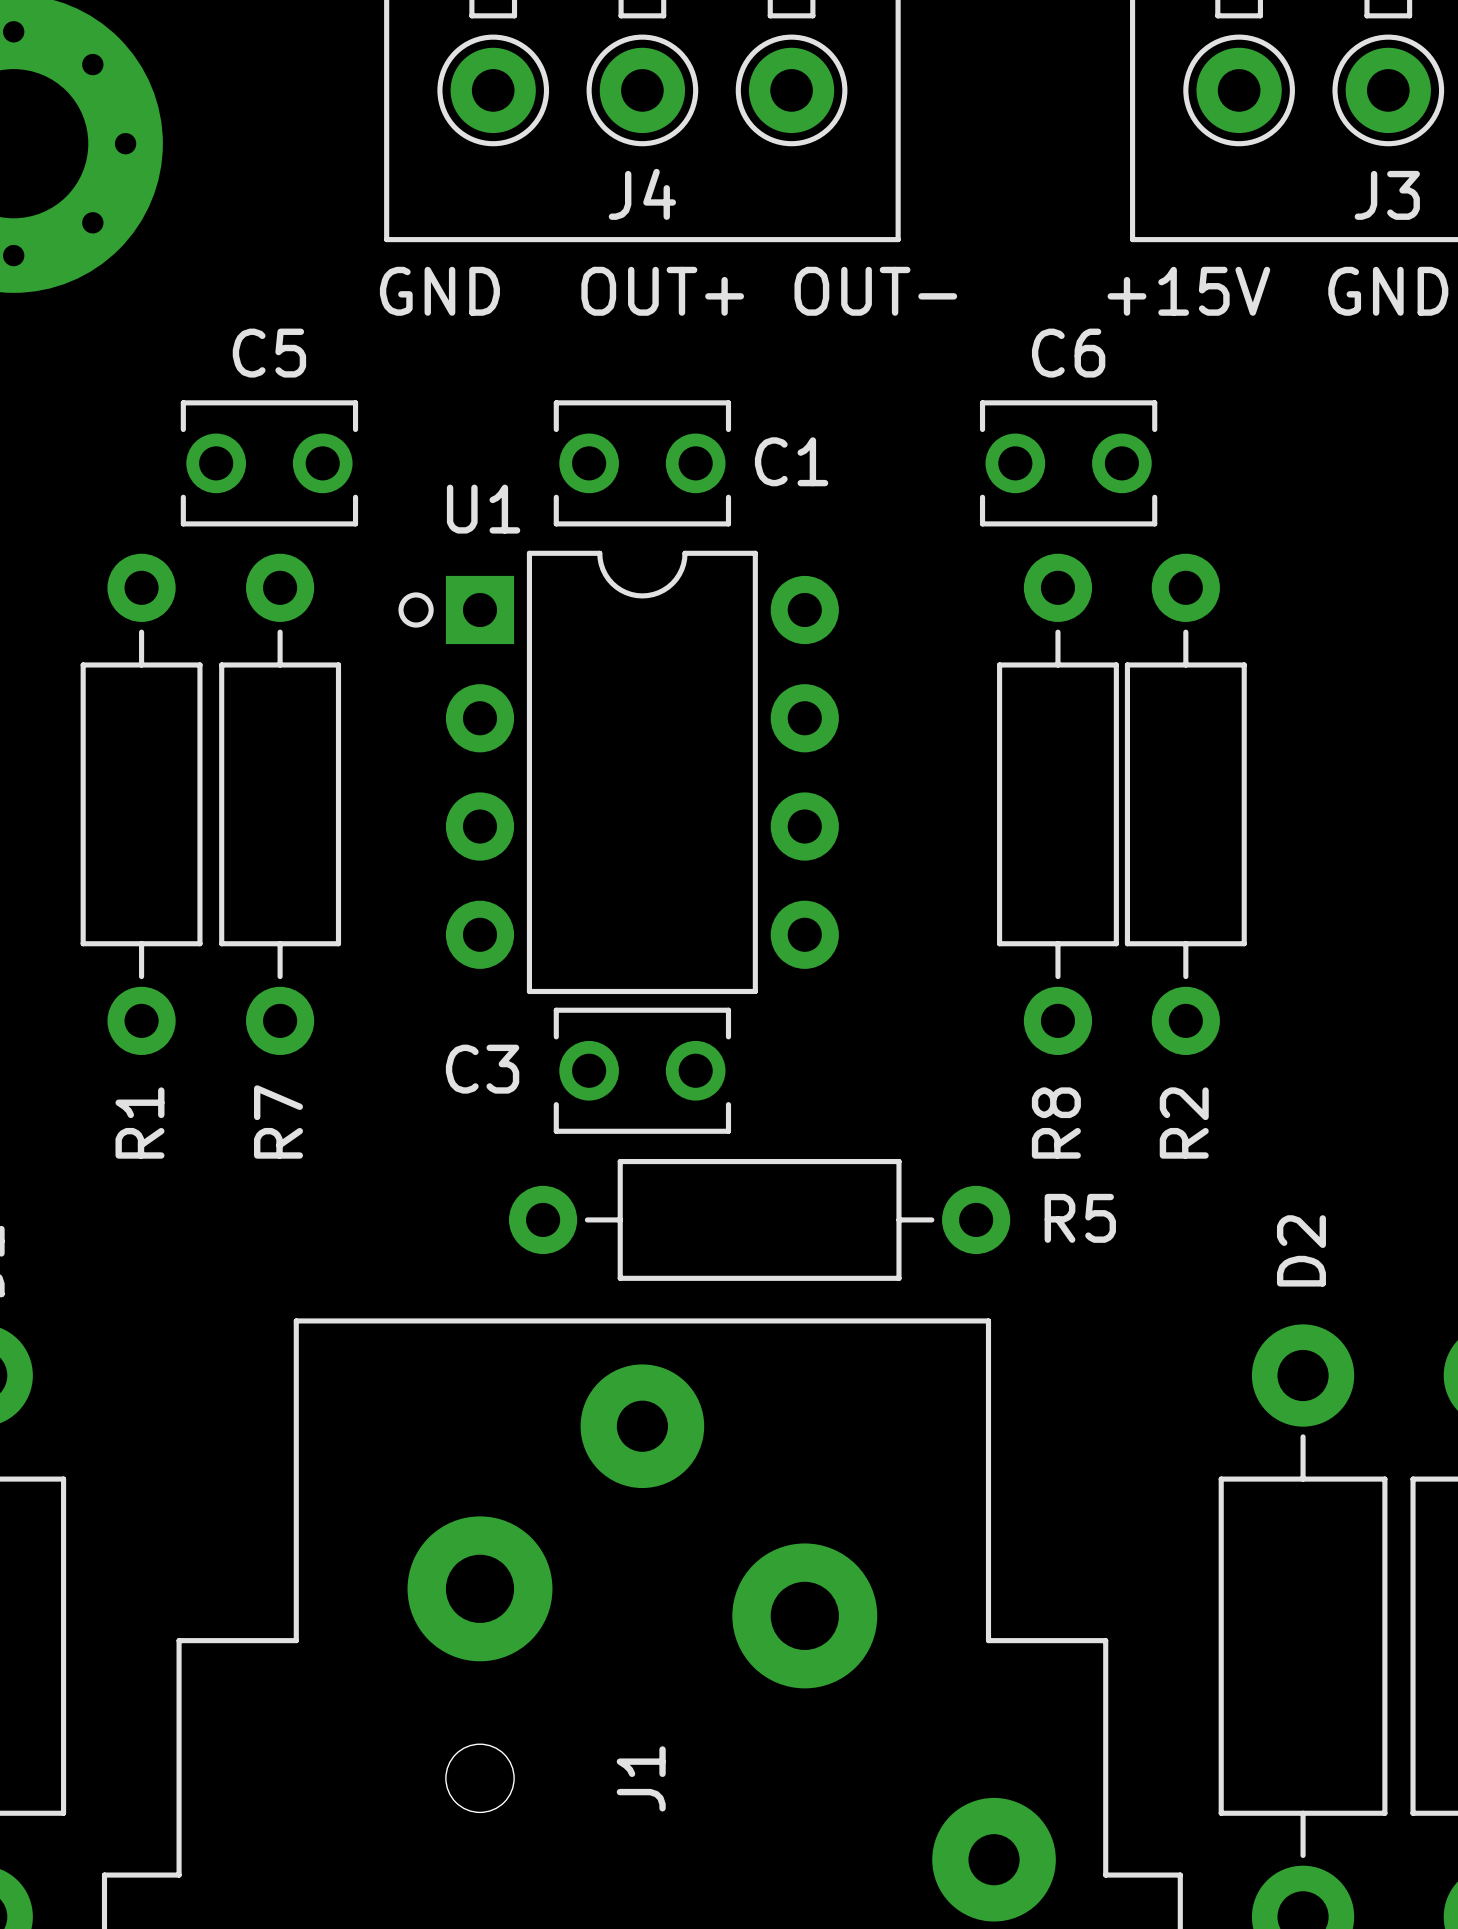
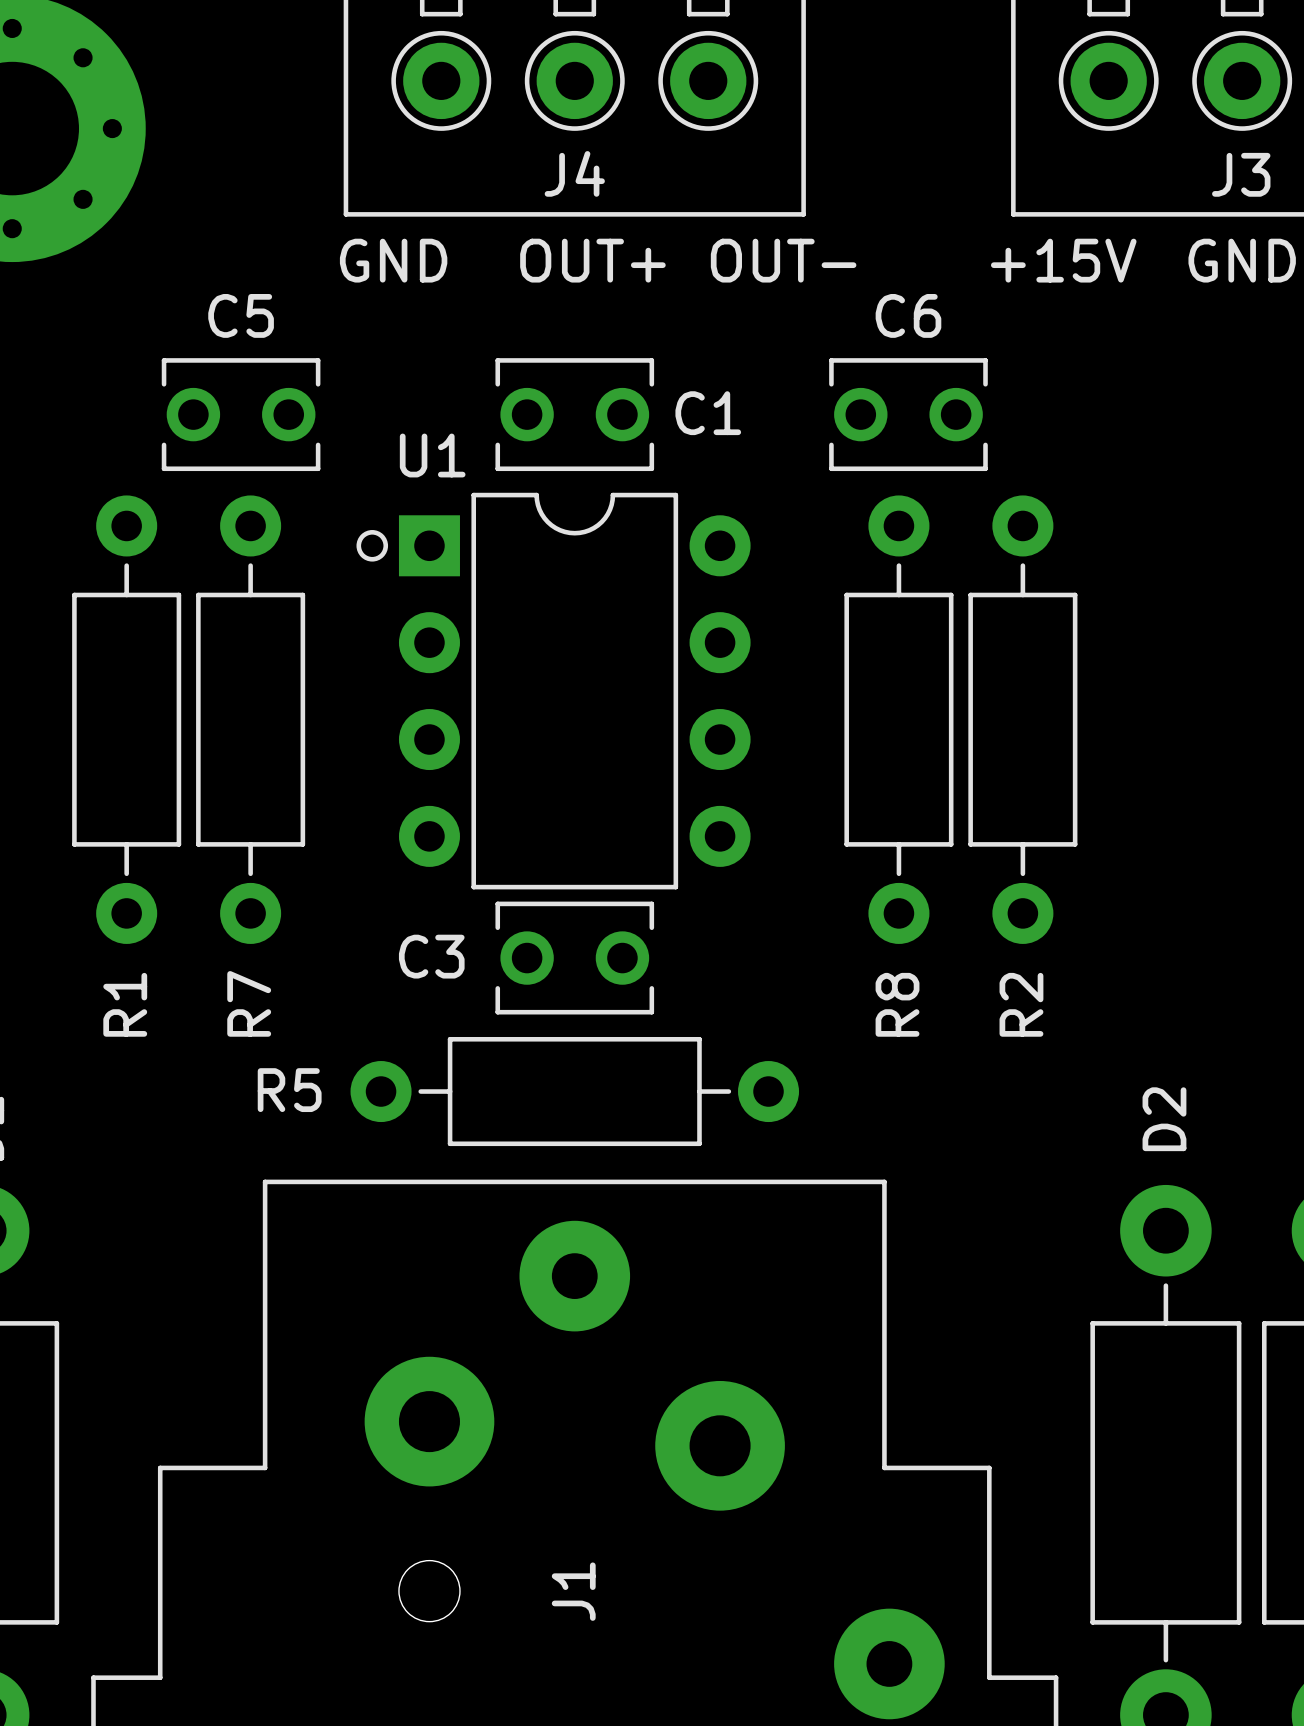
C6 position: (1068, 463) -> (908, 414)
R8 position: (1057, 804) -> (898, 719)
R2 position: (1185, 804) -> (1022, 719)
R5 name position: R5 (1080, 1218) -> R5 (289, 1090)
R5 position: (759, 1219) -> (574, 1091)

